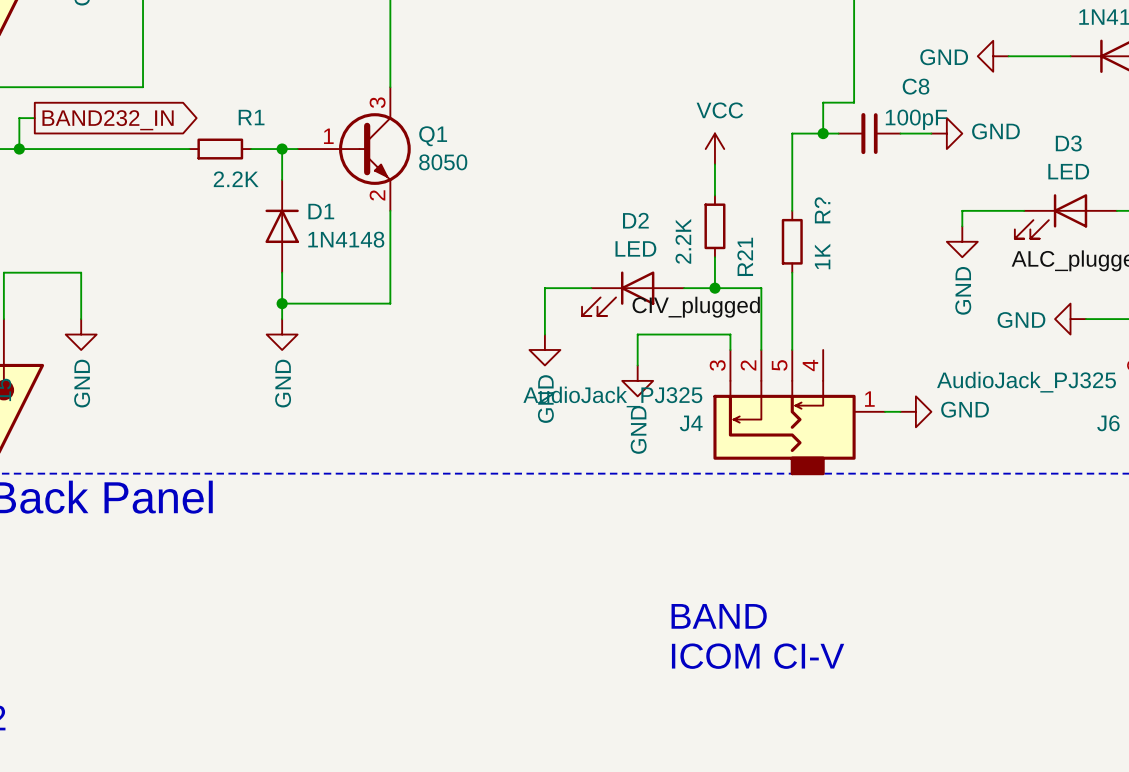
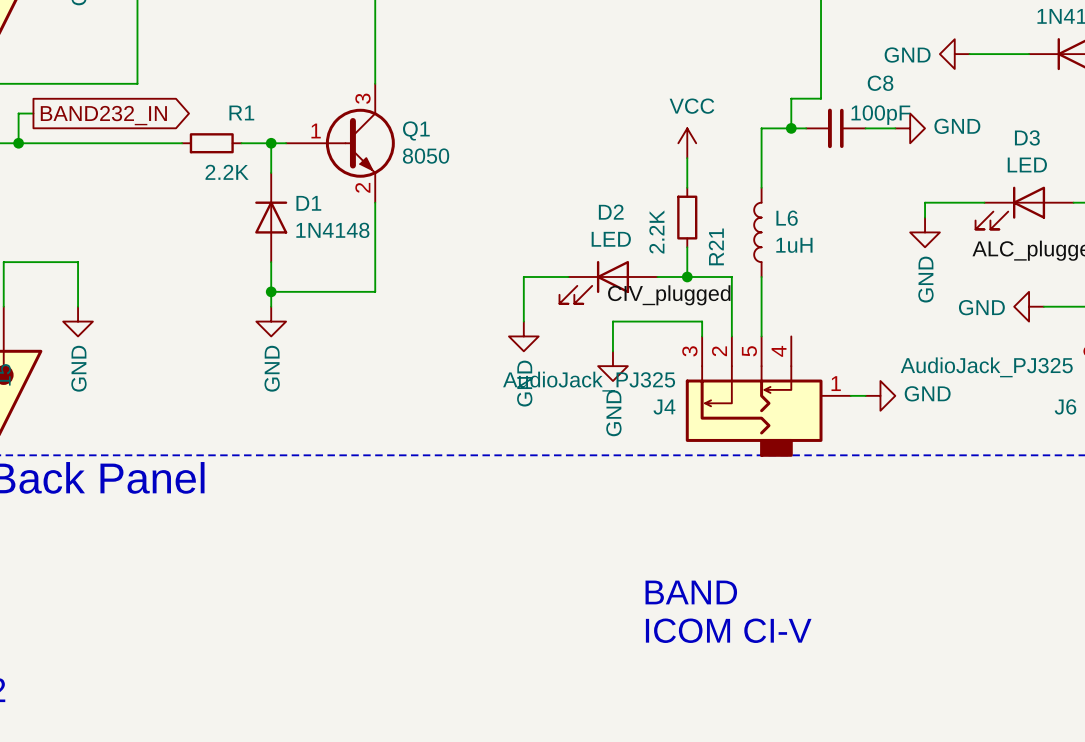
L6: none -> 1uH (757, 232)
R?: 1K (792, 241) -> none

